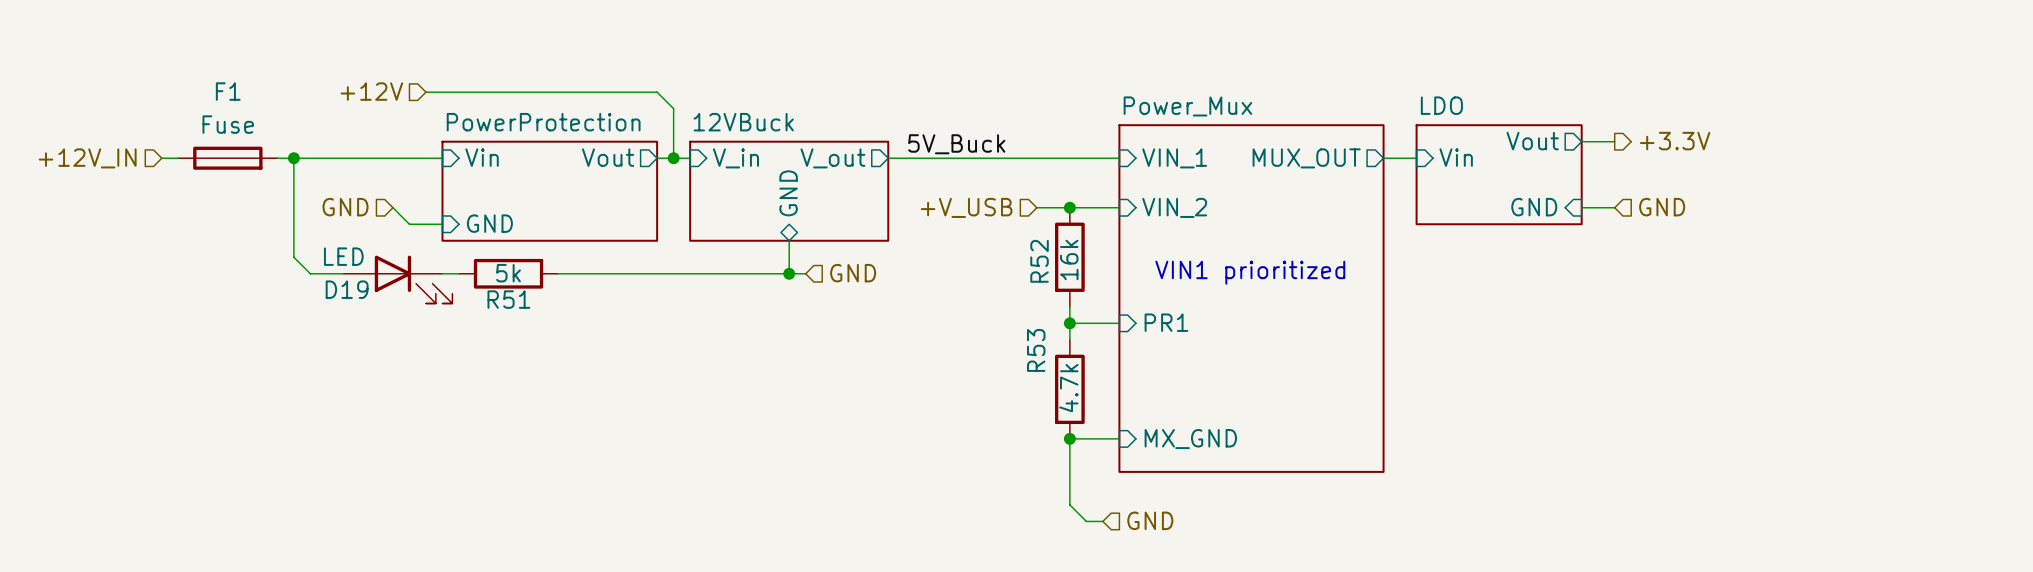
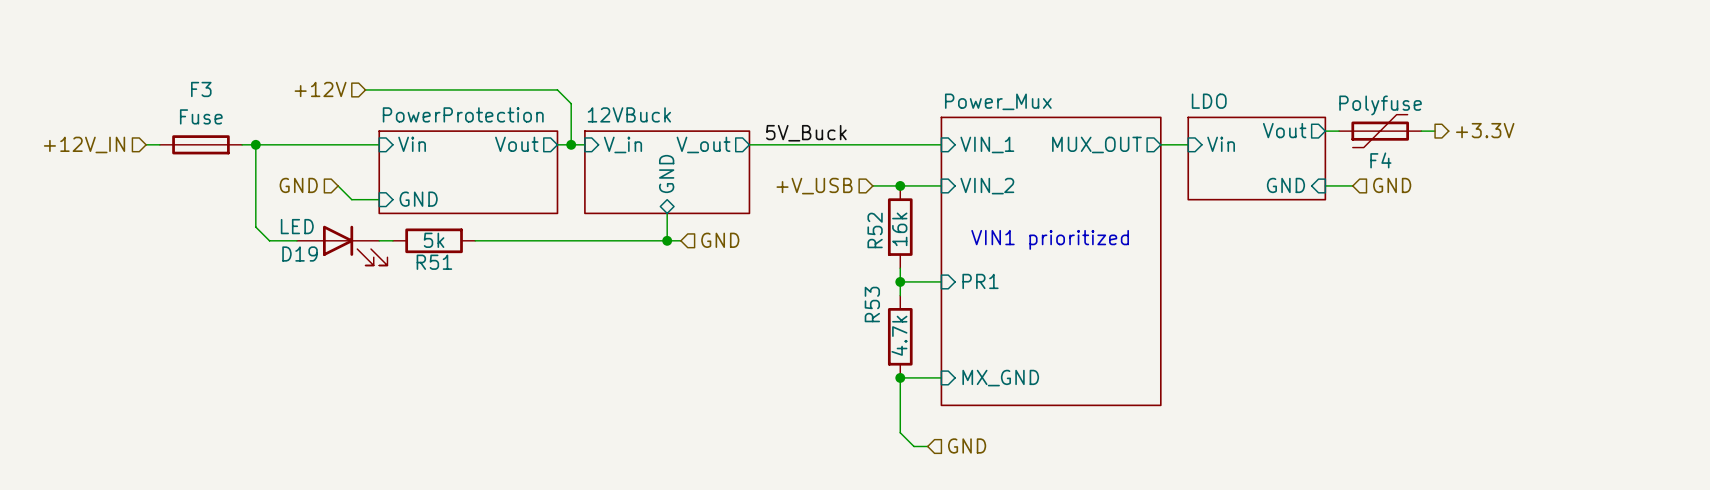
F1 name: F1 (228, 91) -> F3 (201, 89)
F4: none -> Polyfuse (1380, 131)
hierarchical label position: +3.3V (1675, 141) -> +3.3V (1485, 130)

